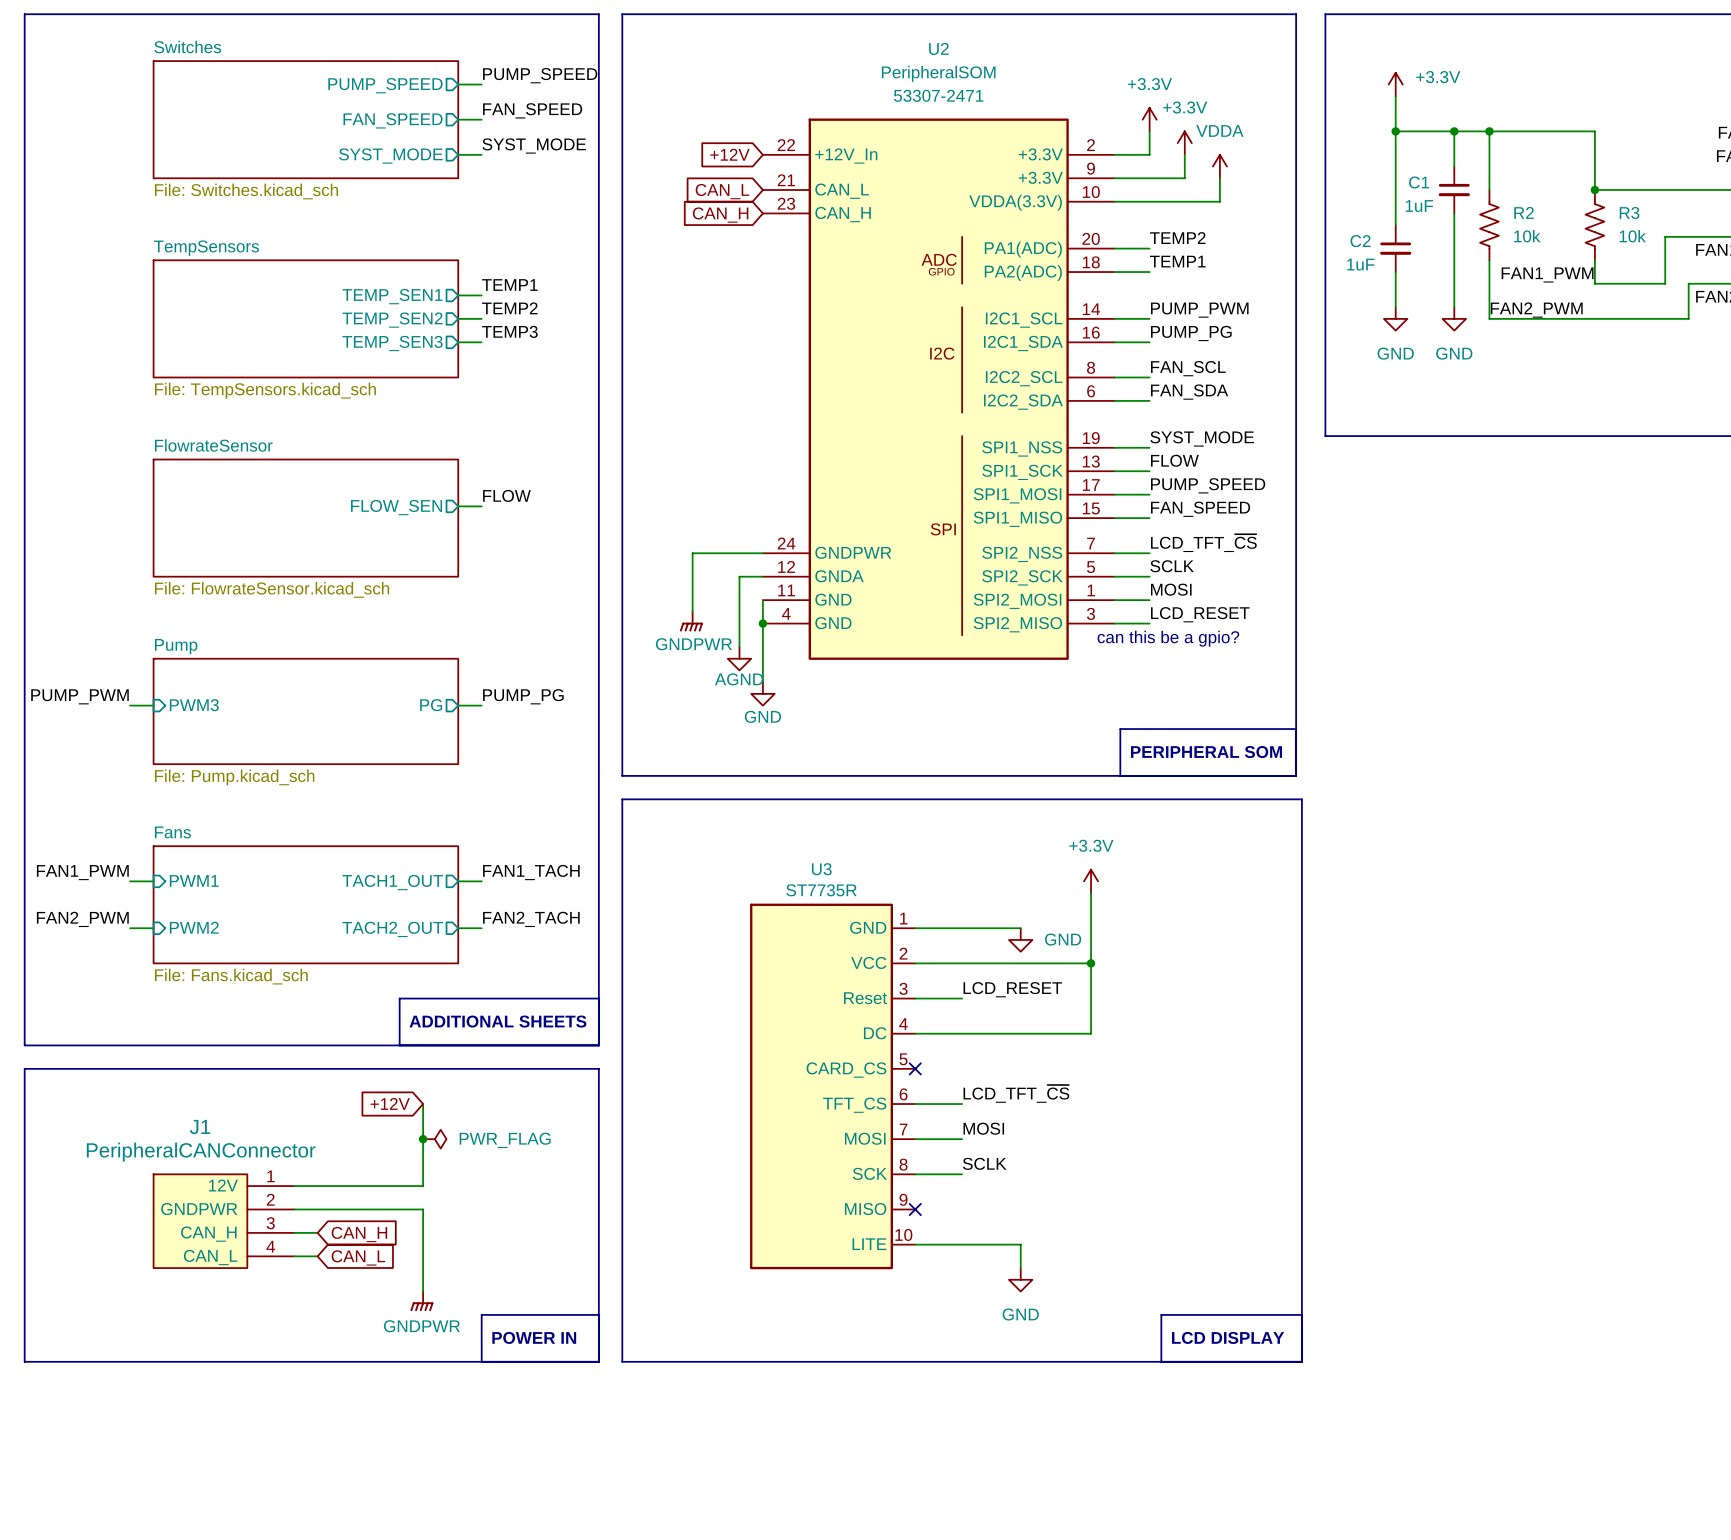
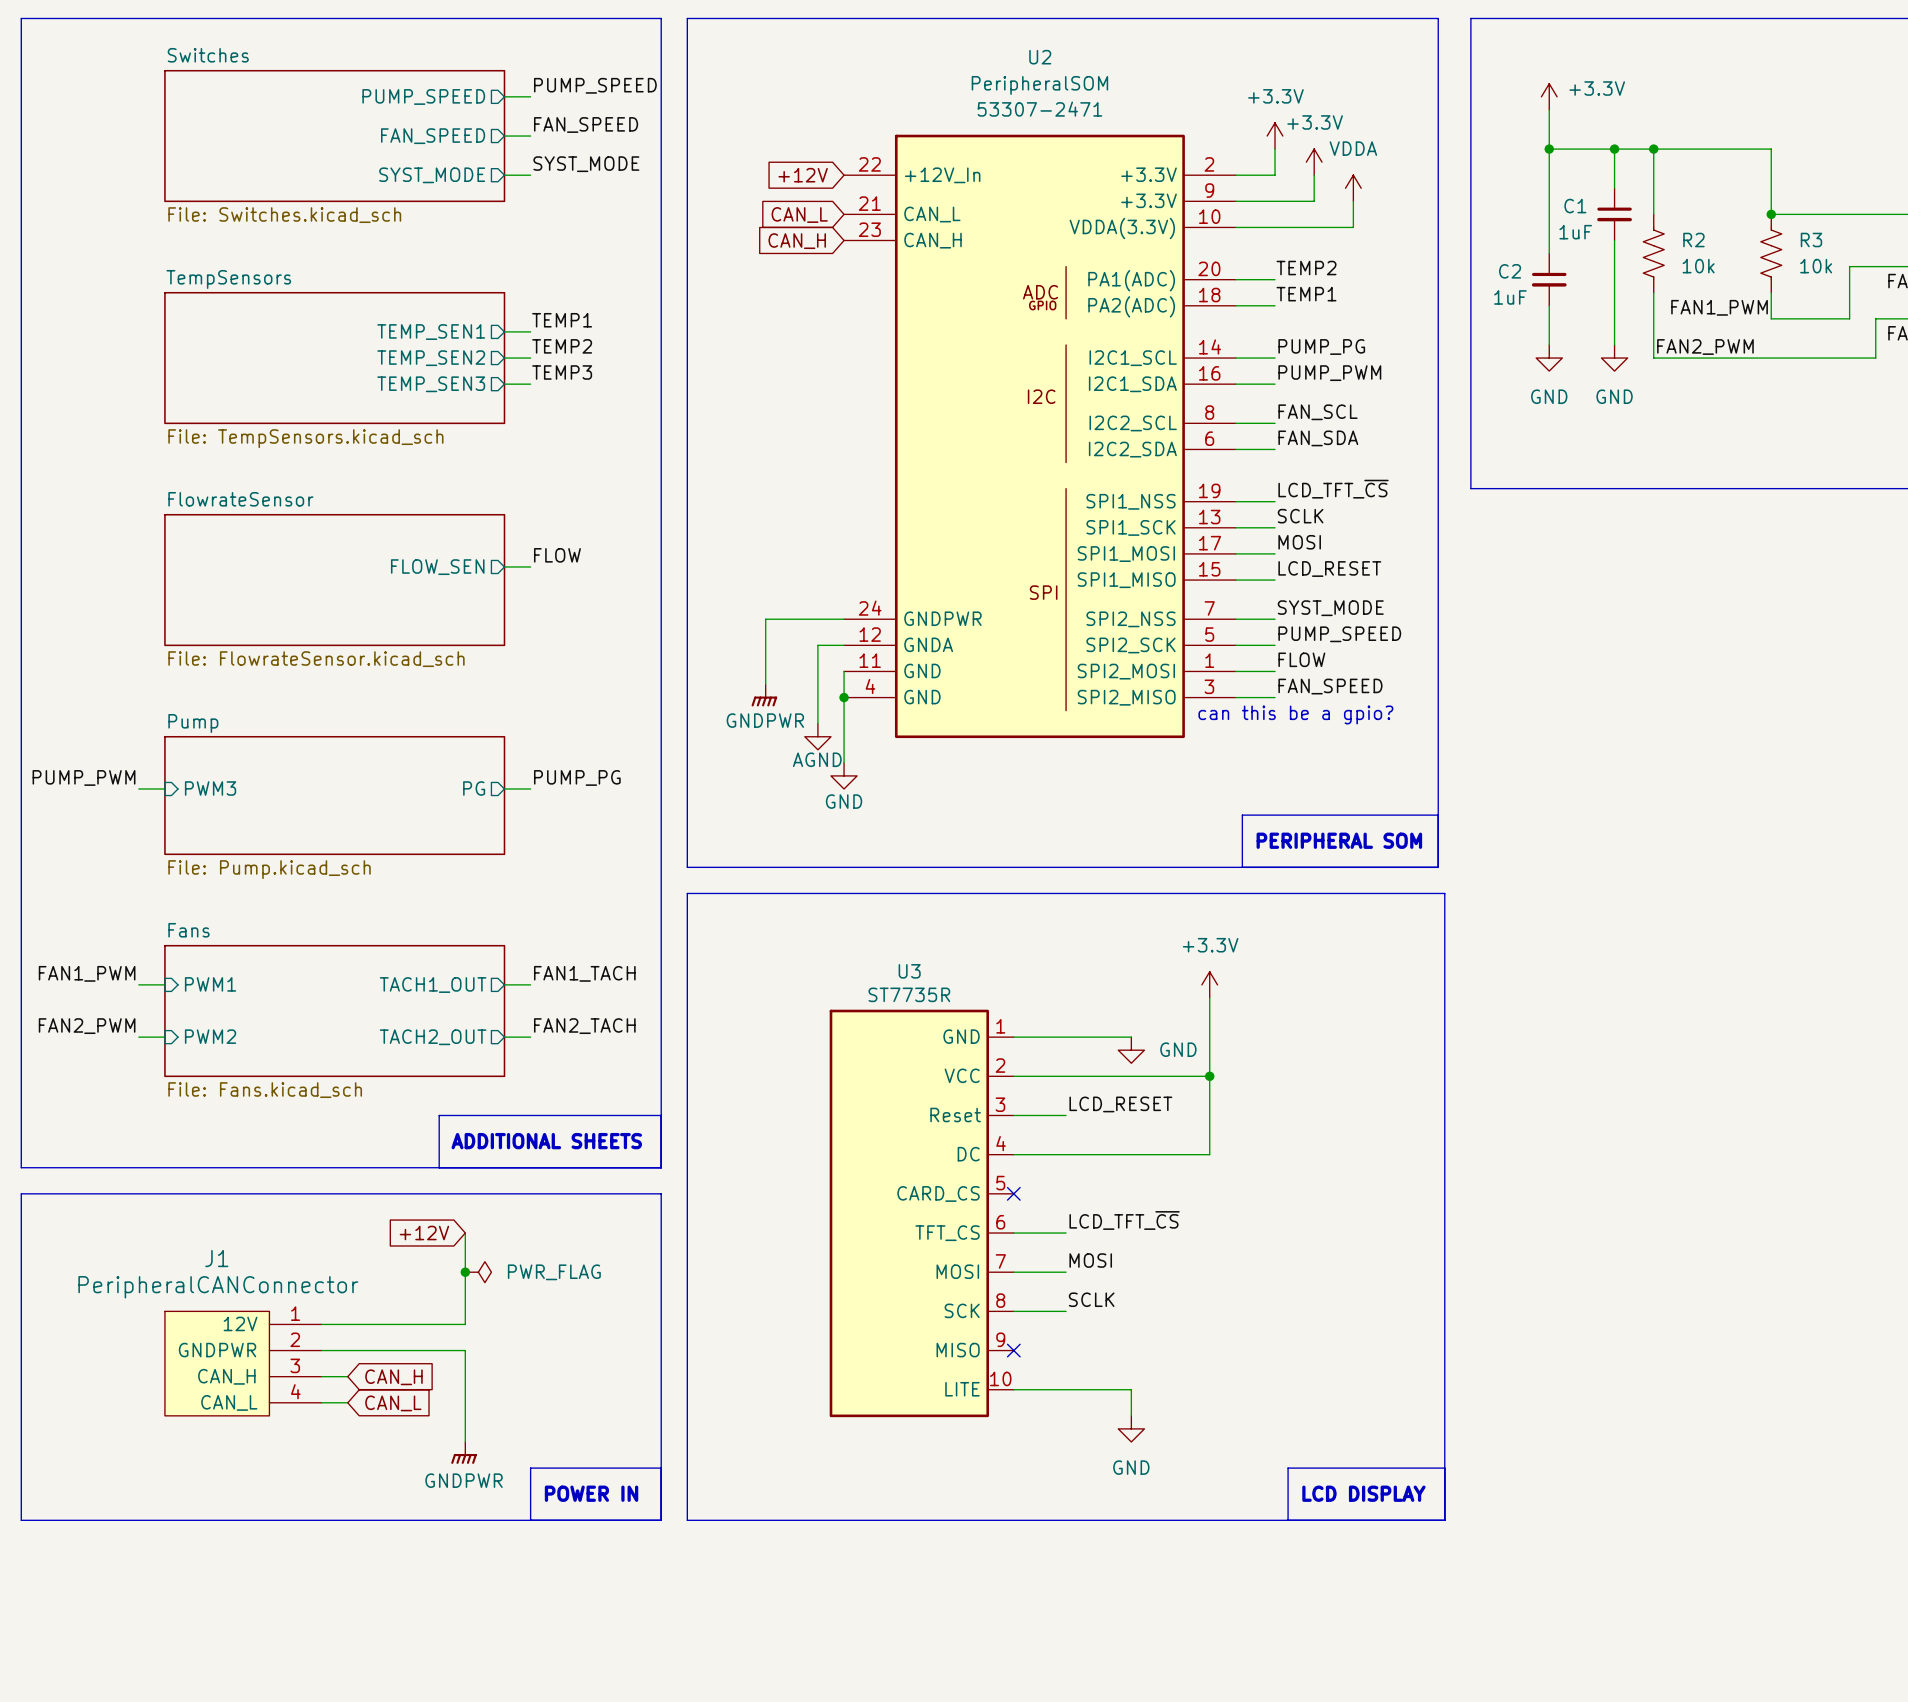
label: PUMP_PWM (1199, 310) -> PUMP_PG (1321, 347)
label: PUMP_PG (1191, 333) -> PUMP_PWM (1329, 373)
label: SYST_MODE (1202, 438) -> LCD_TFT_~{CS} (1333, 489)
label: FLOW (1174, 460) -> SCLK (1300, 516)
label: PUMP_SPEED (1208, 485) -> MOSI (1299, 542)
label: FAN_SPEED (1200, 509) -> LCD_RESET (1329, 569)
label: LCD_TFT_~{CS} (1203, 543) -> SYST_MODE (1330, 608)
label: SCLK (1172, 566) -> PUMP_SPEED (1339, 634)
label: MOSI (1171, 589) -> FLOW (1301, 659)
label: LCD_RESET (1200, 614) -> FAN_SPEED (1330, 686)

